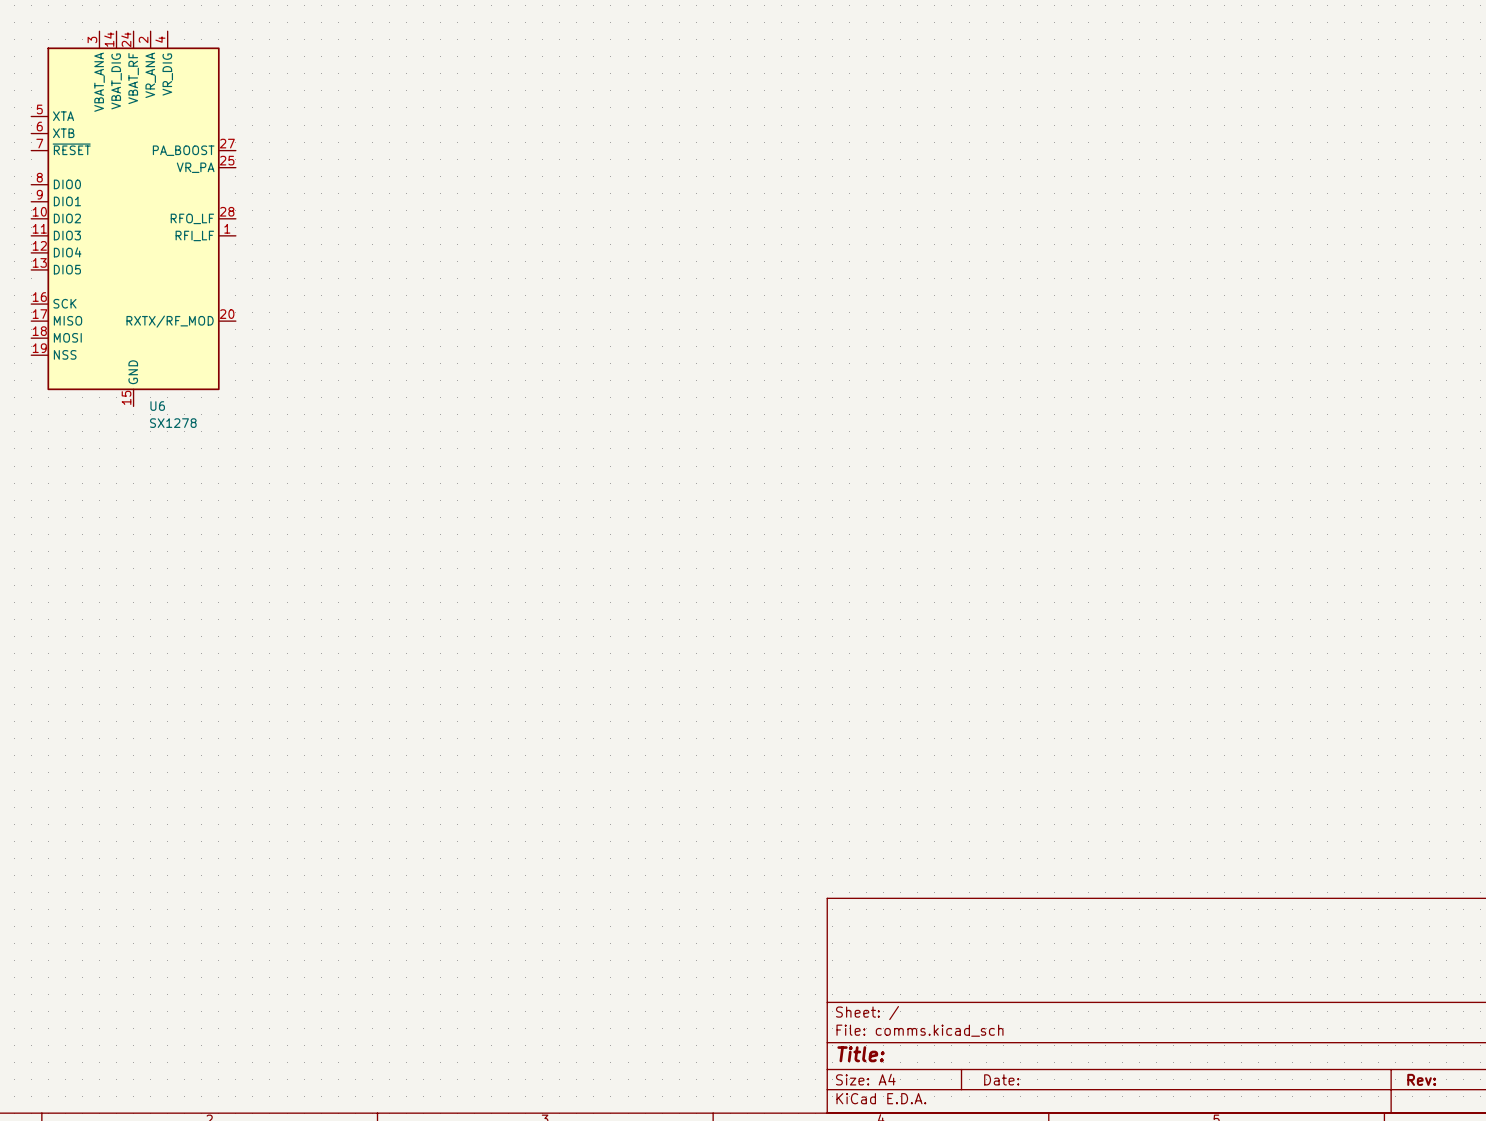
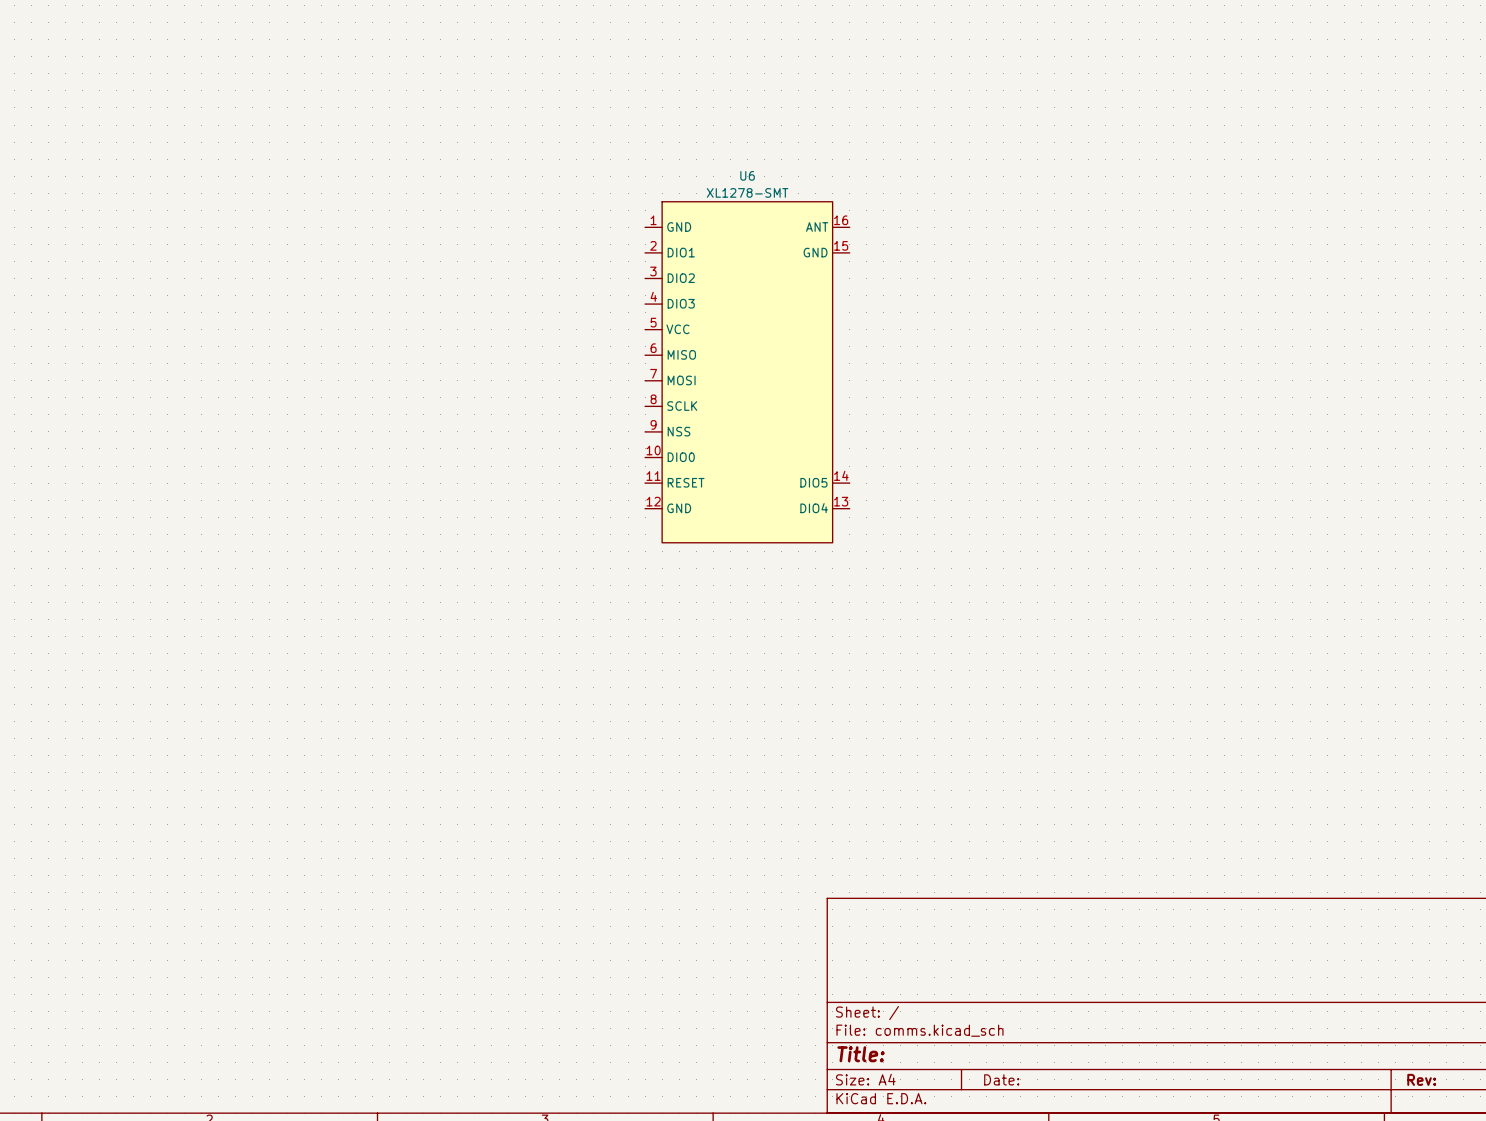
U6 symbol: [31, 31, 236, 407] -> [645, 201, 850, 543]
U6 name position: U6 (157, 406) -> U6 (747, 175)
U6 value: SX1278 (173, 423) -> XL1278-SMT (747, 192)

